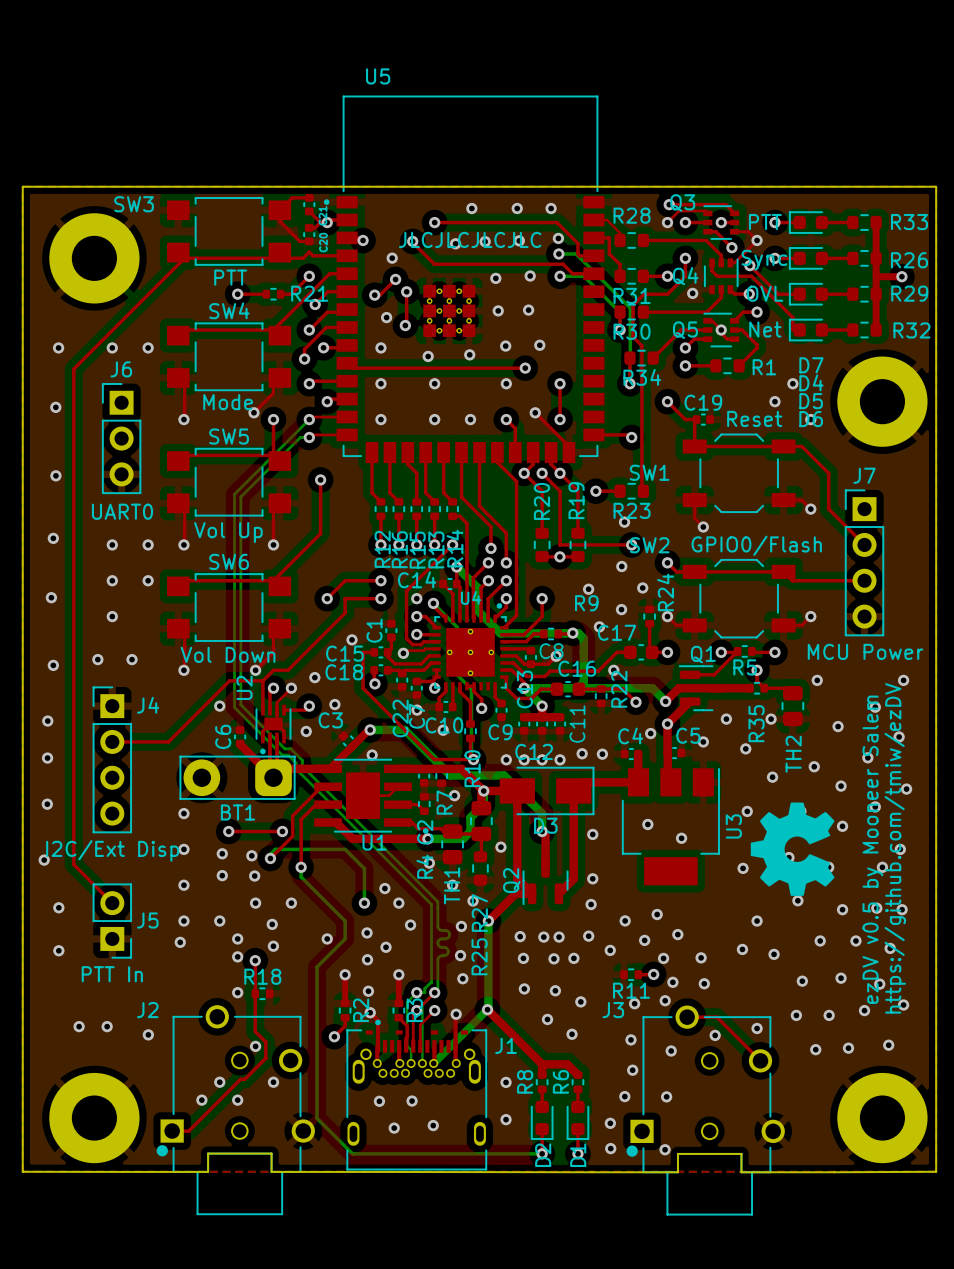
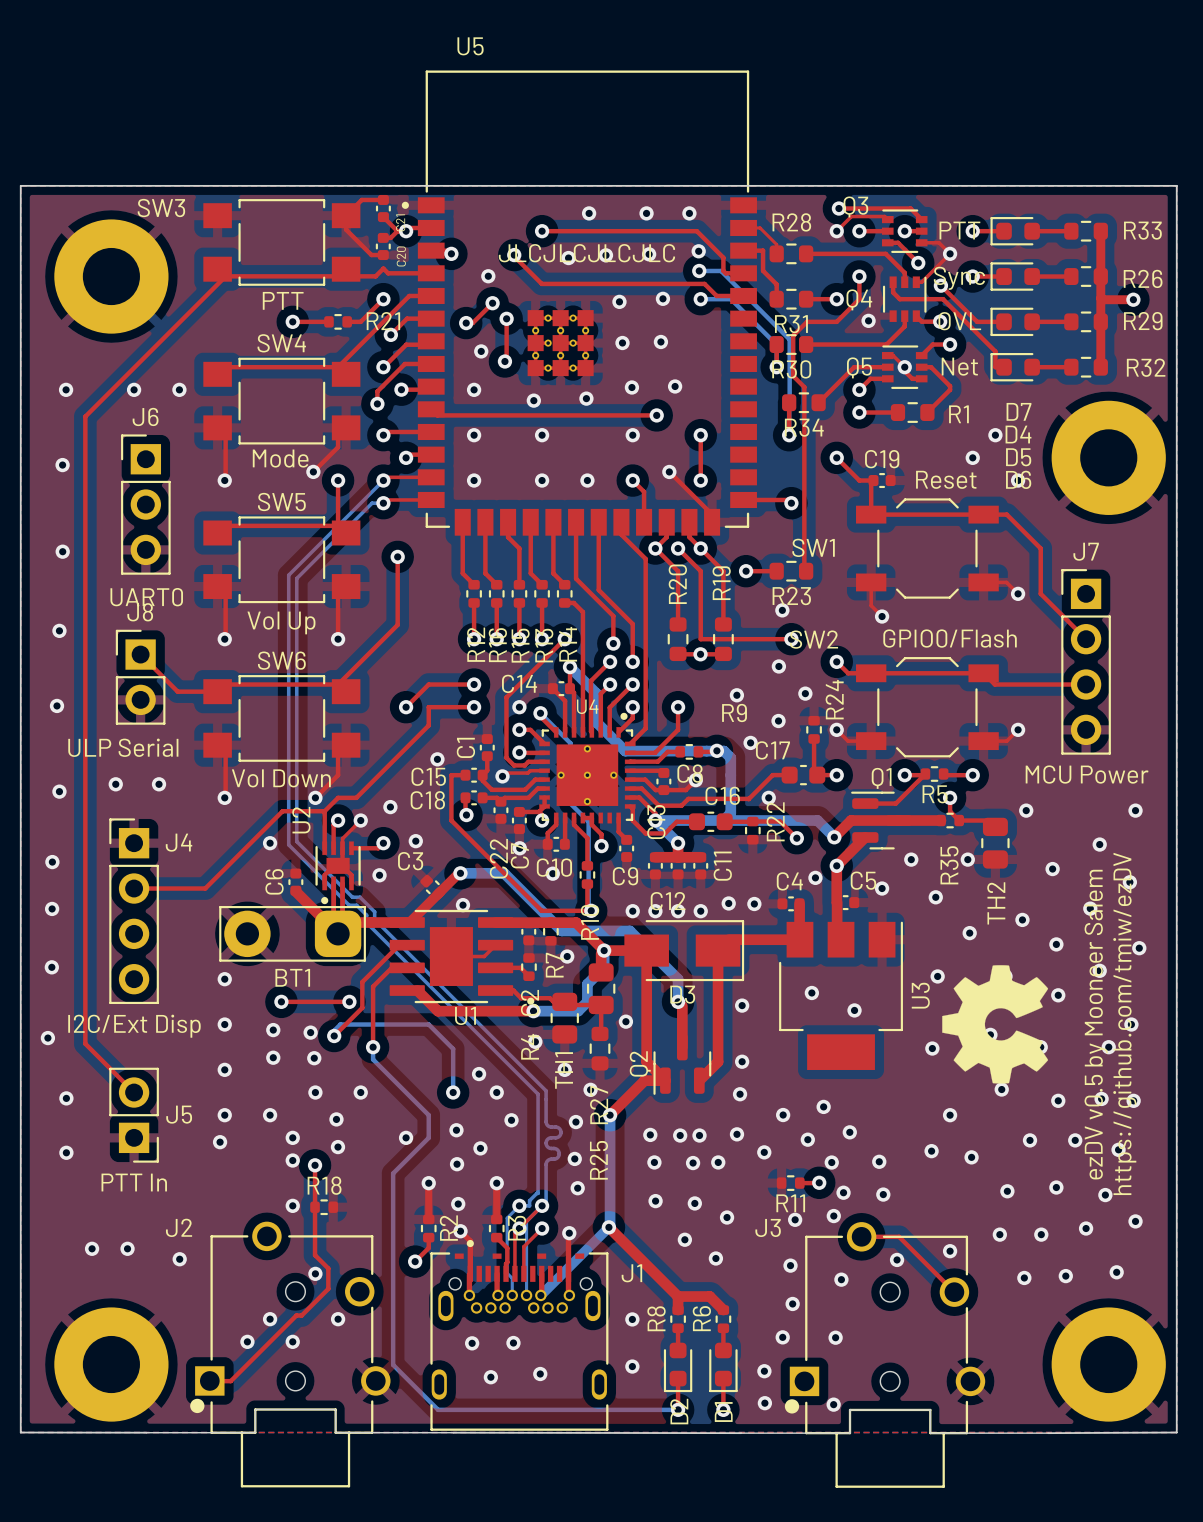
via: (112, 544) -> none
via: (148, 544) -> none
top track: none -> (140, 654) (177, 691) (217, 691)
J8: none -> (140, 677)
via: (112, 580) -> none
via: (148, 580) -> none
via: (112, 616) -> none
text: none -> ULP Serial (123, 747)

